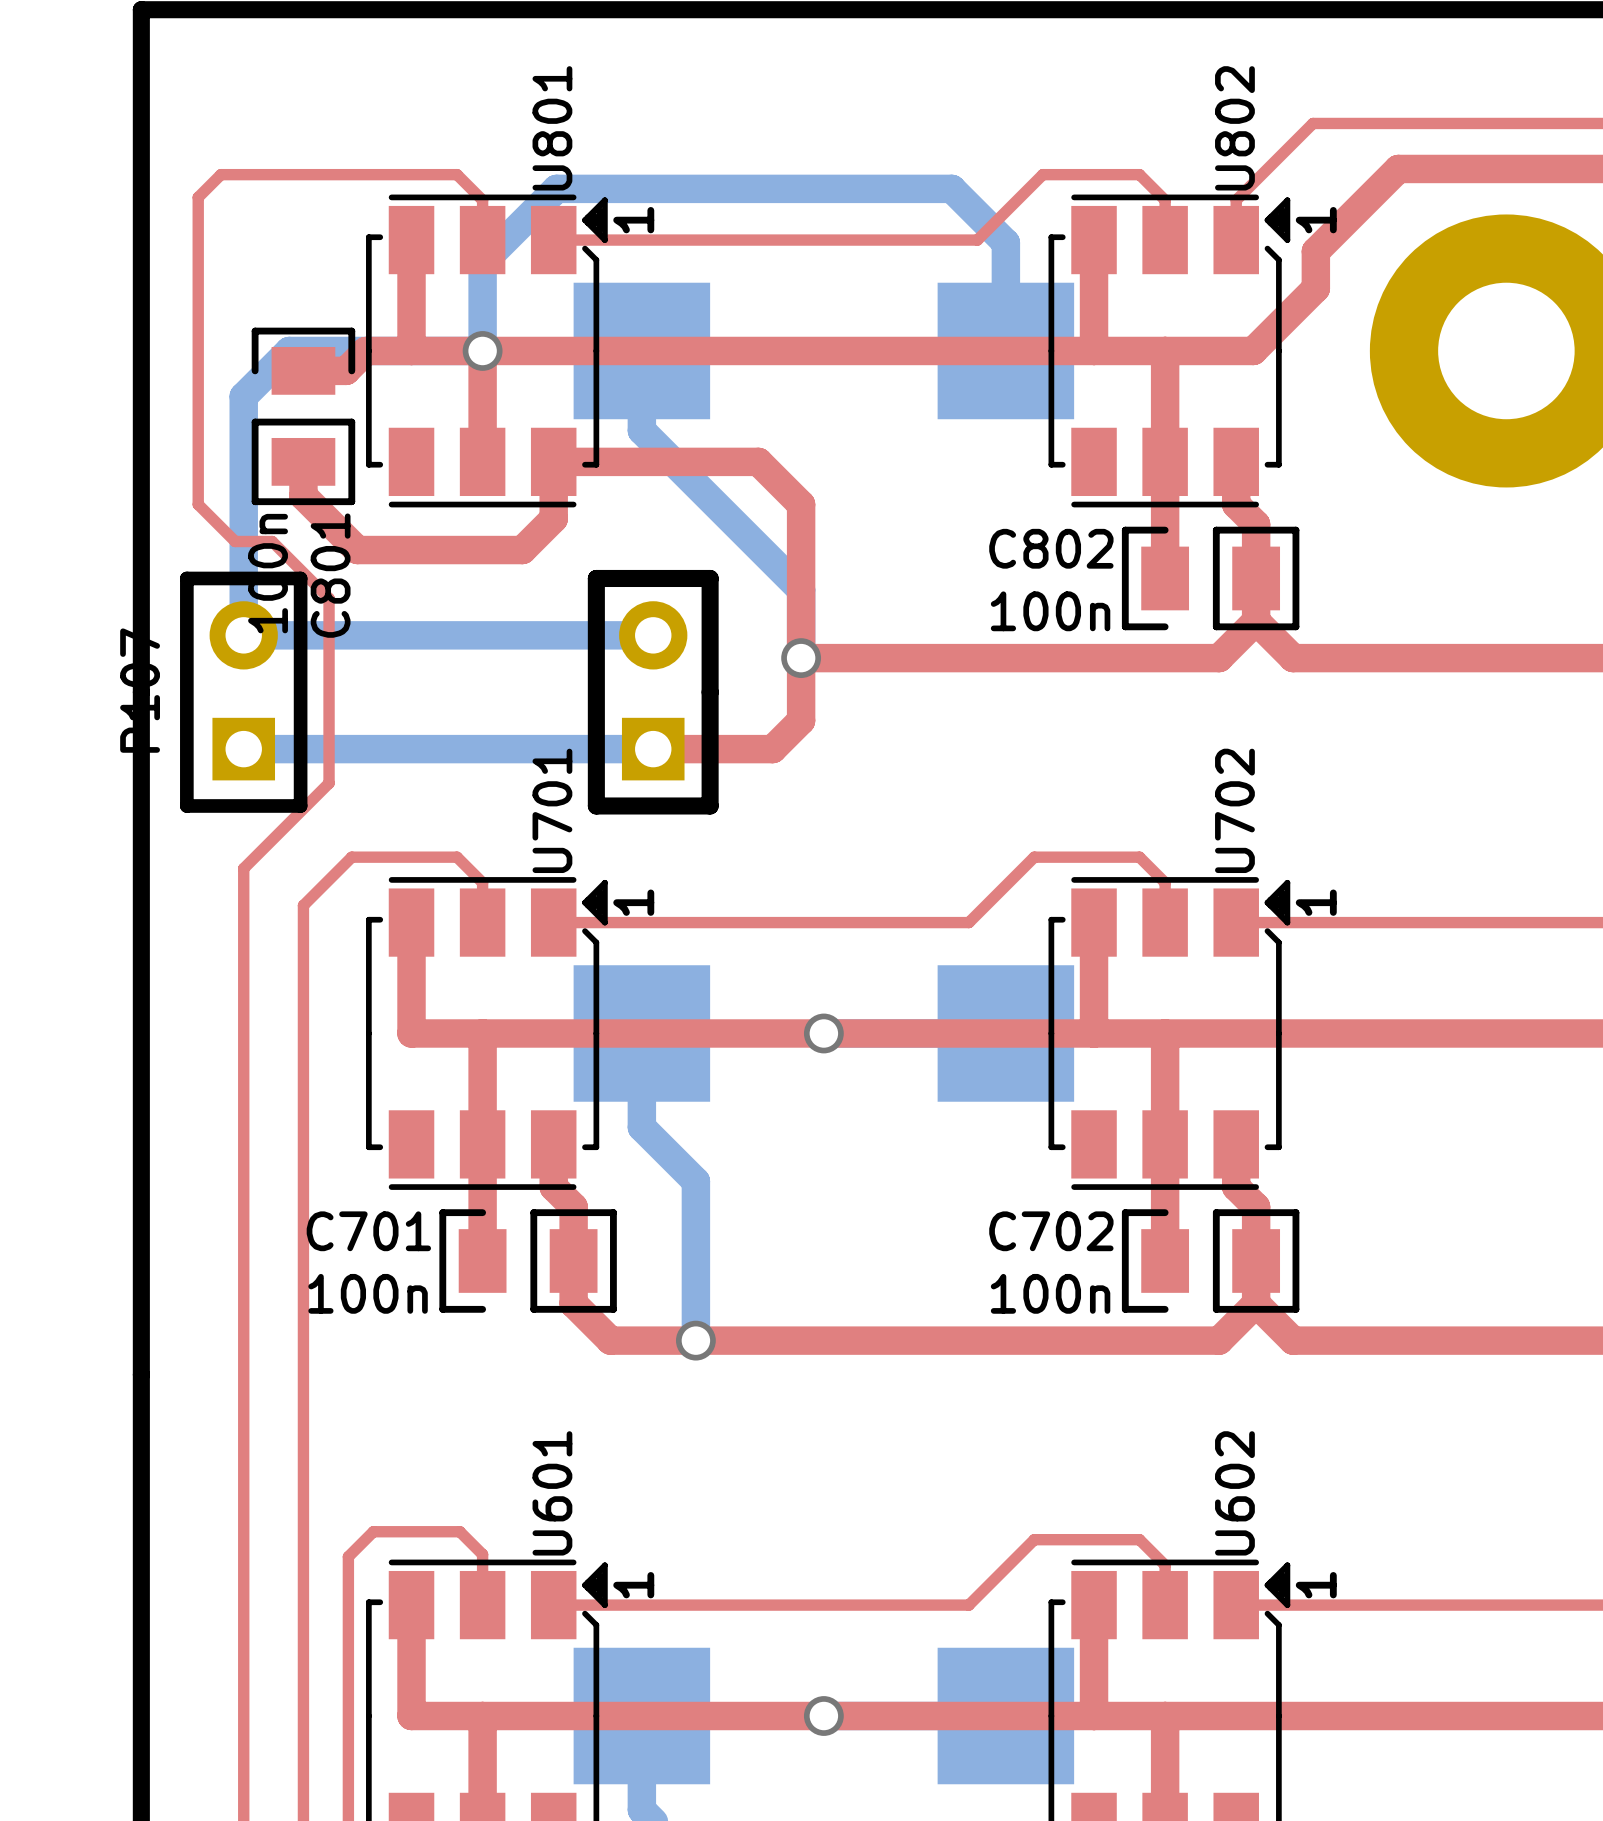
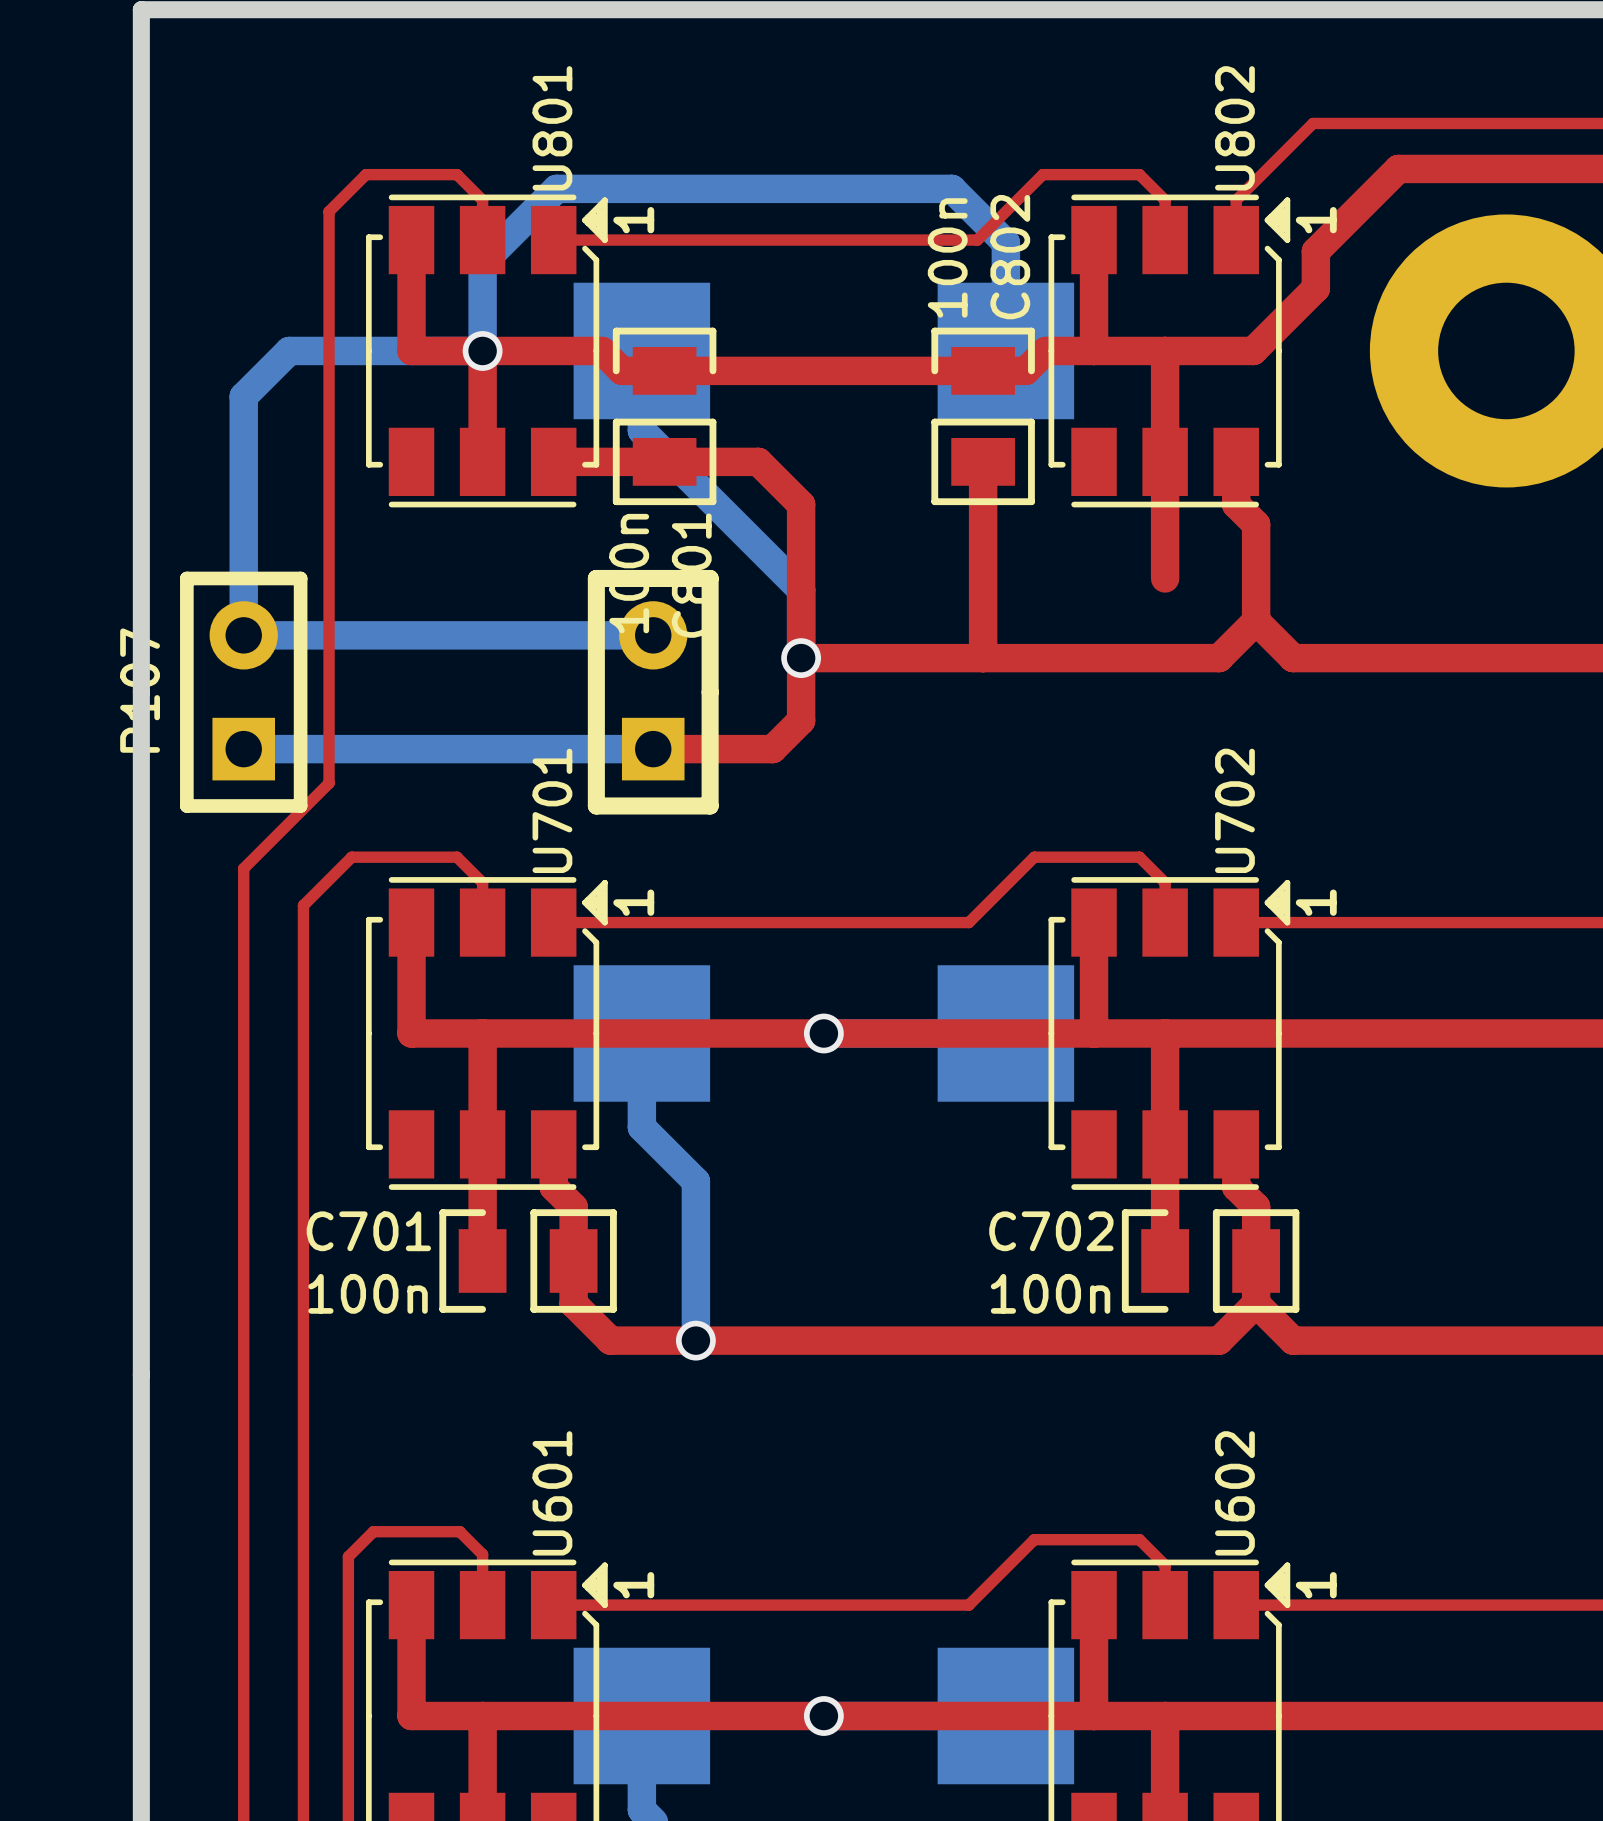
top track: (366, 174) (220, 174) (198, 197) (198, 504) (235, 541) (272, 541) (329, 598) -> (366, 174) (329, 211) (329, 598)
top track: (411, 350) (366, 350) (346, 370) (303, 370) -> none
top track: (602, 350) (1045, 350) -> (602, 350) (621, 370) (1025, 370) (1045, 350)
C801 position: (303, 416) -> (664, 416)
top track: (303, 461) (303, 496) (357, 550) (522, 550) (553, 518) (553, 461) -> none
top track: none -> (983, 461) (983, 658)
C802 rotation: 0° (1210, 578) -> 90° clockwise (983, 416)
C802 position: (1210, 578) -> (983, 416)

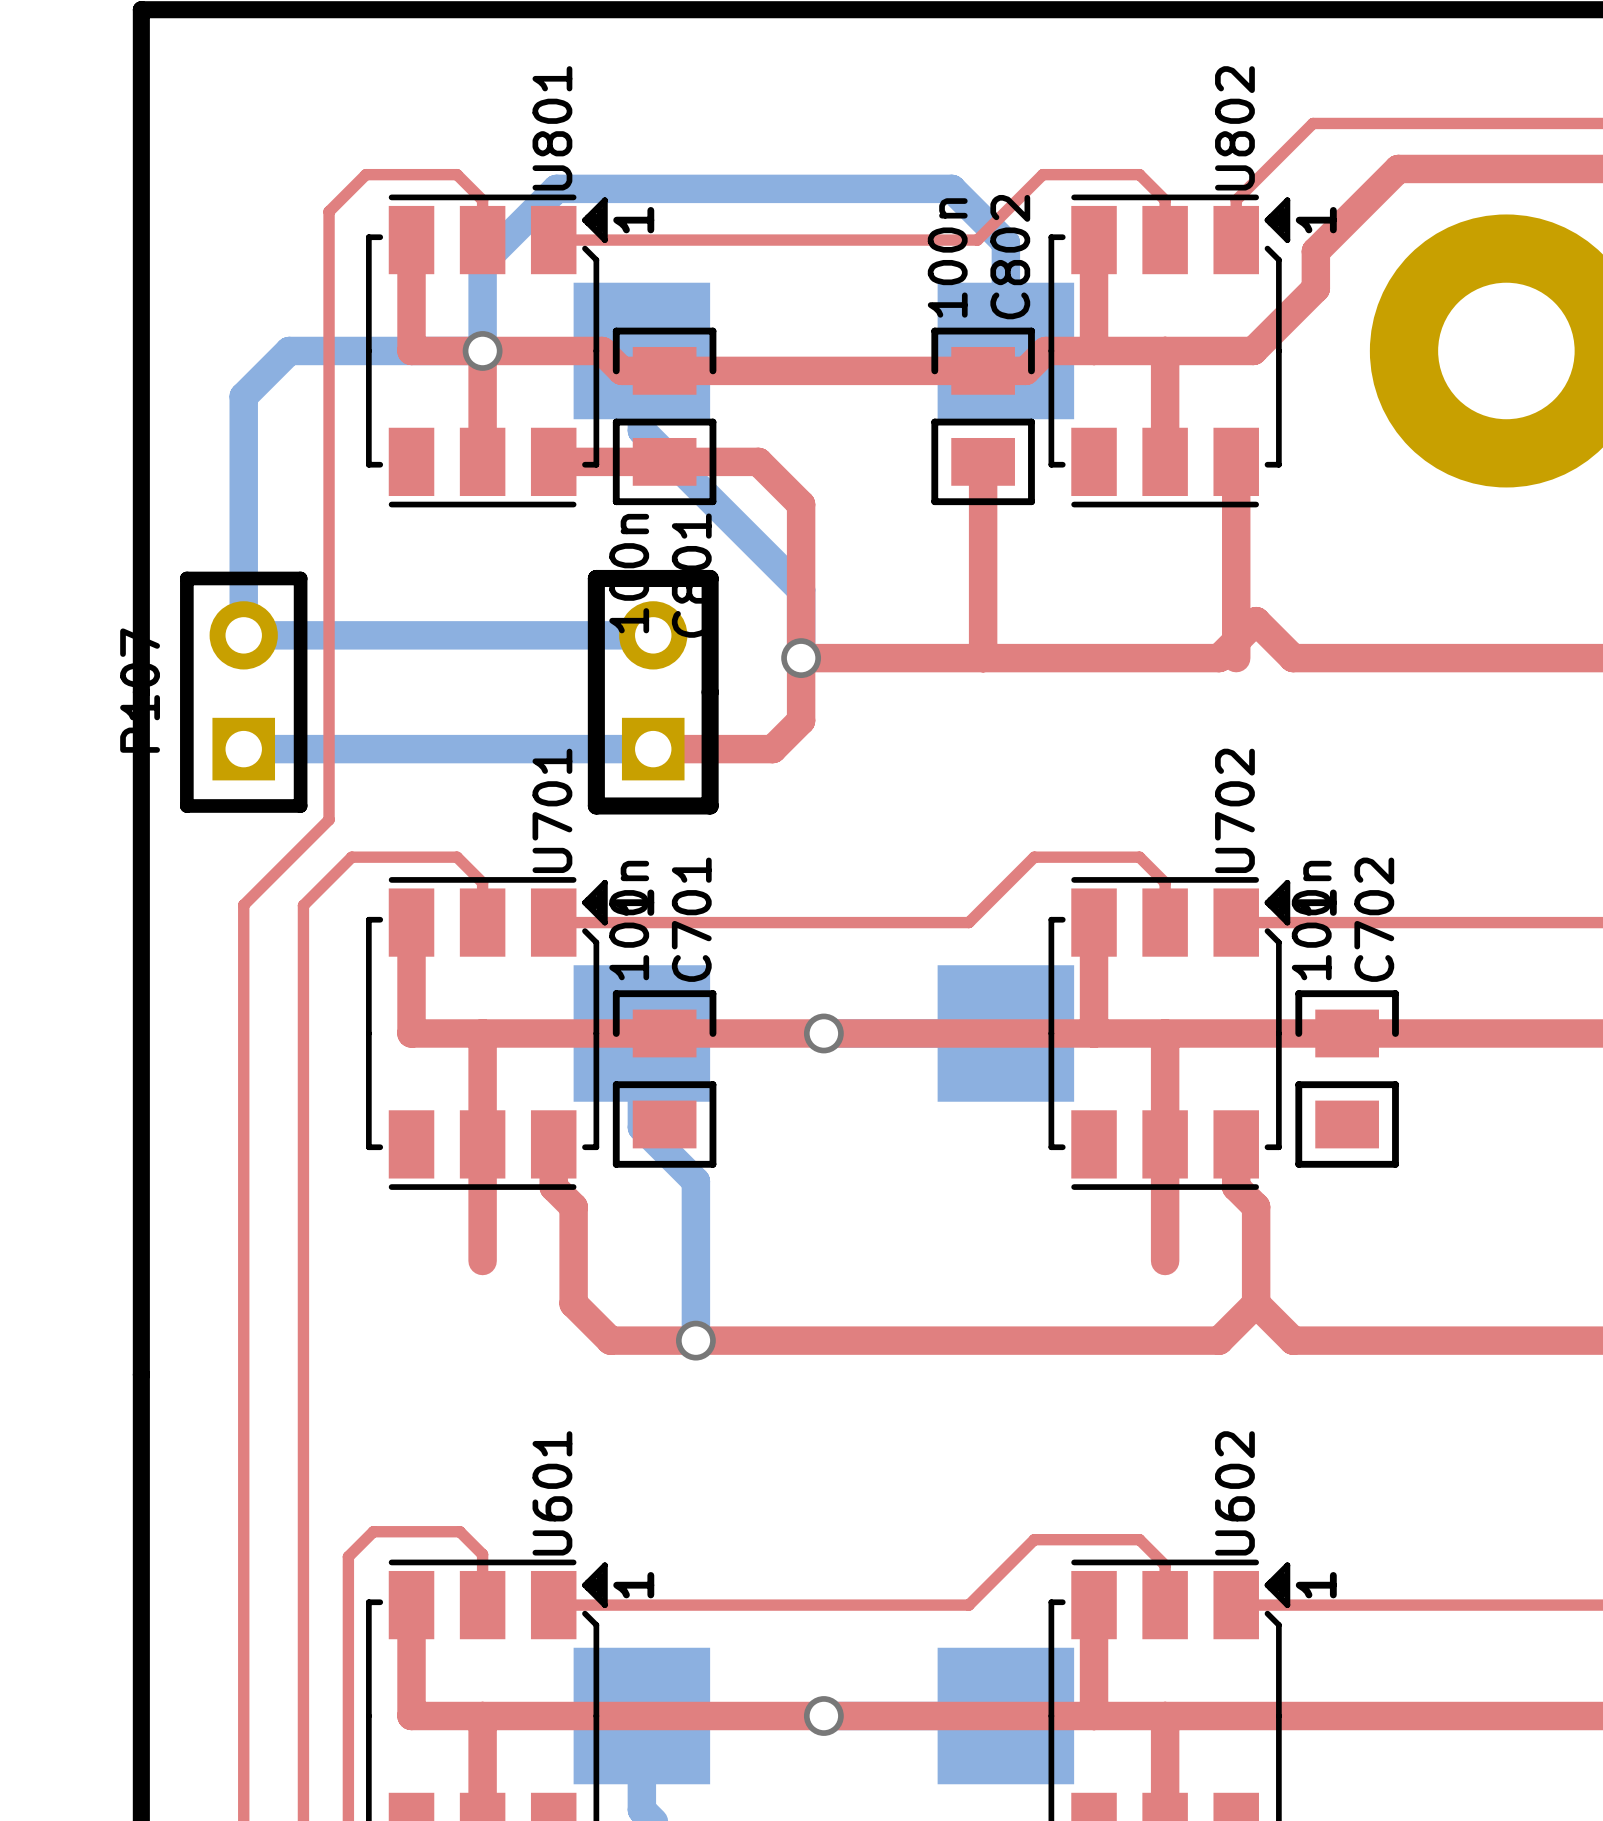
top track: (1165, 461) (1165, 578) -> none
top track: (1236, 504) (1256, 524) (1256, 621) -> (1236, 504) (1236, 658)
top track: (329, 783) (243, 868) (243, 905) -> (329, 783) (329, 819) (243, 905)
C701 rotation: 0° (528, 1260) -> 90° clockwise (664, 1078)
C701 position: (528, 1260) -> (664, 1078)
C702 rotation: 0° (1210, 1260) -> 90° clockwise (1347, 1078)
C702 position: (1210, 1260) -> (1347, 1078)

